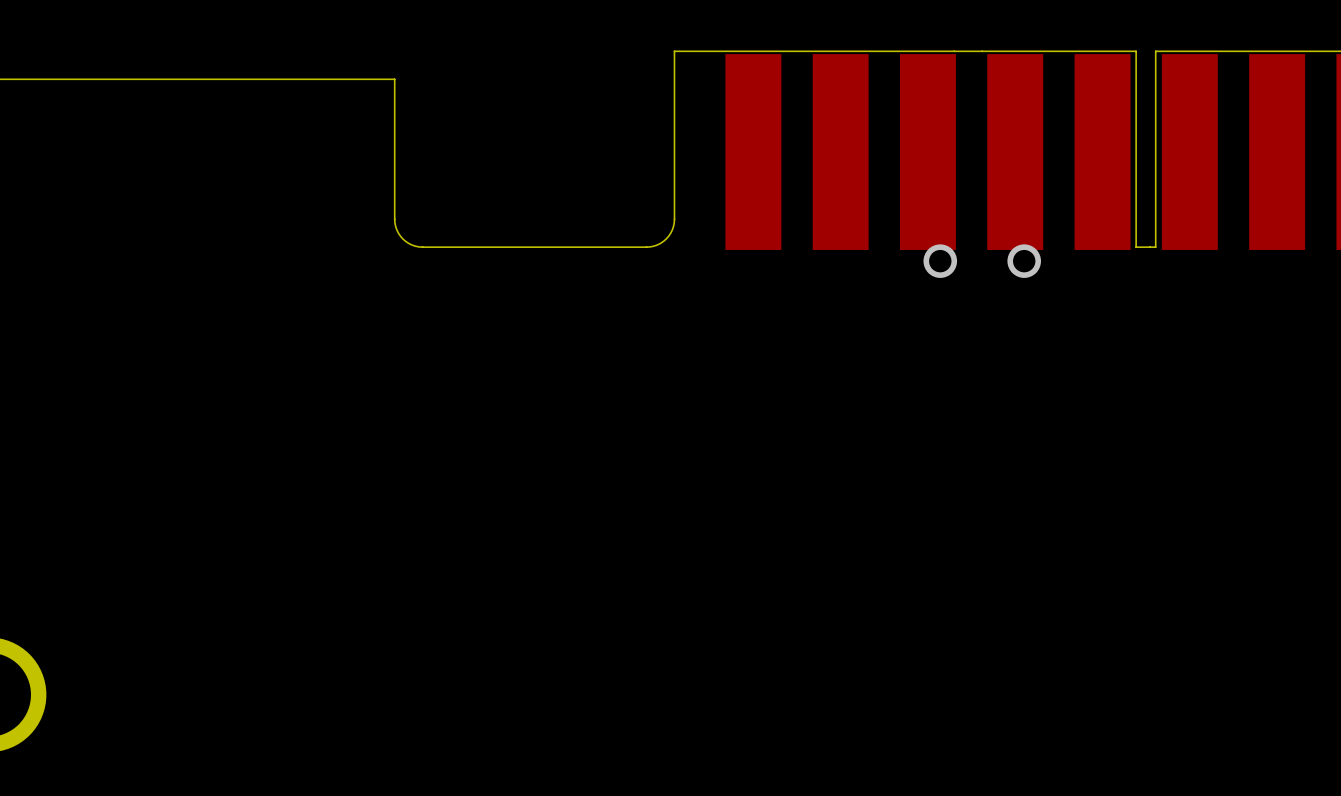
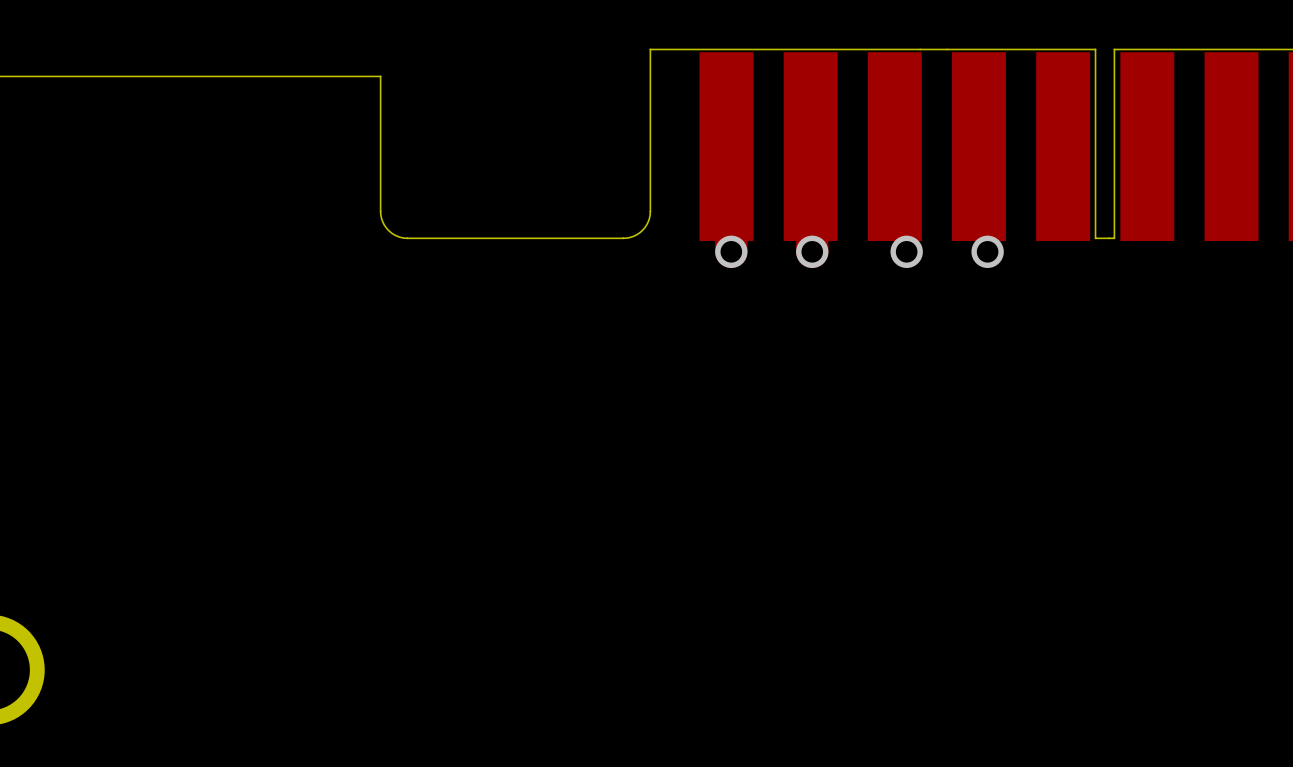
via: none -> (731, 251)
via: none -> (812, 251)

